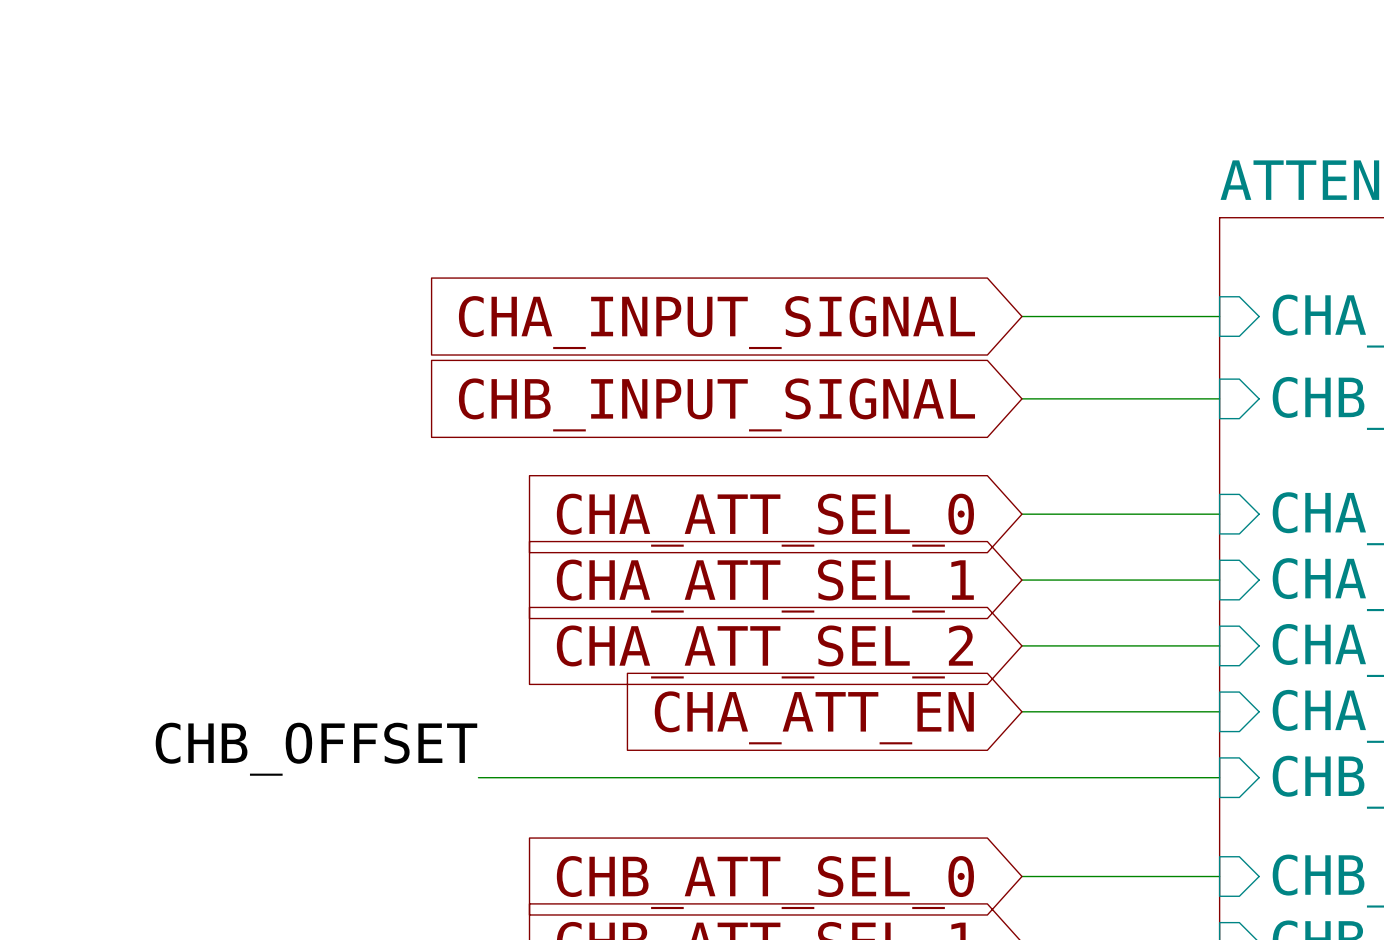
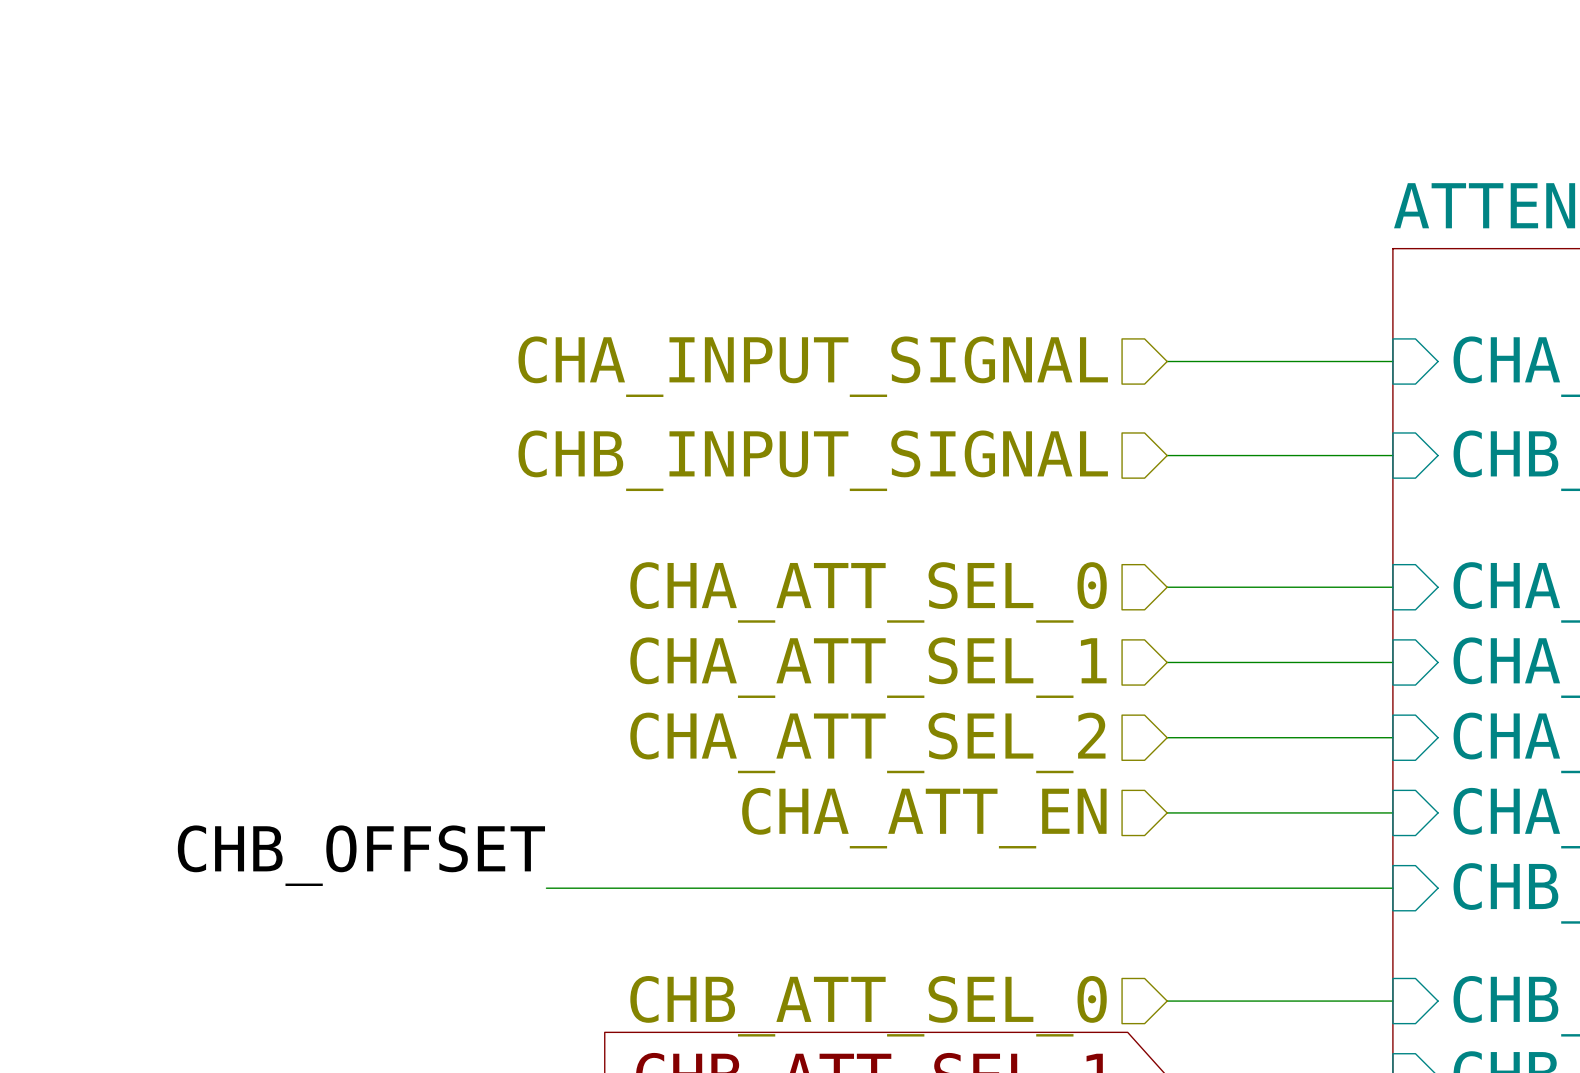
hierarchical label: none -> CHA_INPUT_SIGNAL (813, 366)
global label: CHA_INPUT_SIGNAL (716, 322) -> none
hierarchical label: none -> CHB_INPUT_SIGNAL (813, 460)
global label: CHB_INPUT_SIGNAL (716, 404) -> none
hierarchical label: none -> CHA_ATT_SEL_0 (868, 592)
global label: CHA_ATT_SEL_0 (765, 520) -> none
hierarchical label: none -> CHA_ATT_SEL_1 (868, 667)
global label: CHA_ATT_SEL_1 (765, 586) -> none
hierarchical label: none -> CHA_ATT_SEL_2 (867, 742)
global label: CHA_ATT_SEL_2 (764, 651) -> none
hierarchical label: none -> CHA_ATT_EN (924, 818)
global label: CHA_ATT_EN (814, 717) -> none
hierarchical label: none -> CHB_ATT_SEL_0 (868, 1006)
global label: CHB_ATT_SEL_0 (765, 882) -> none

